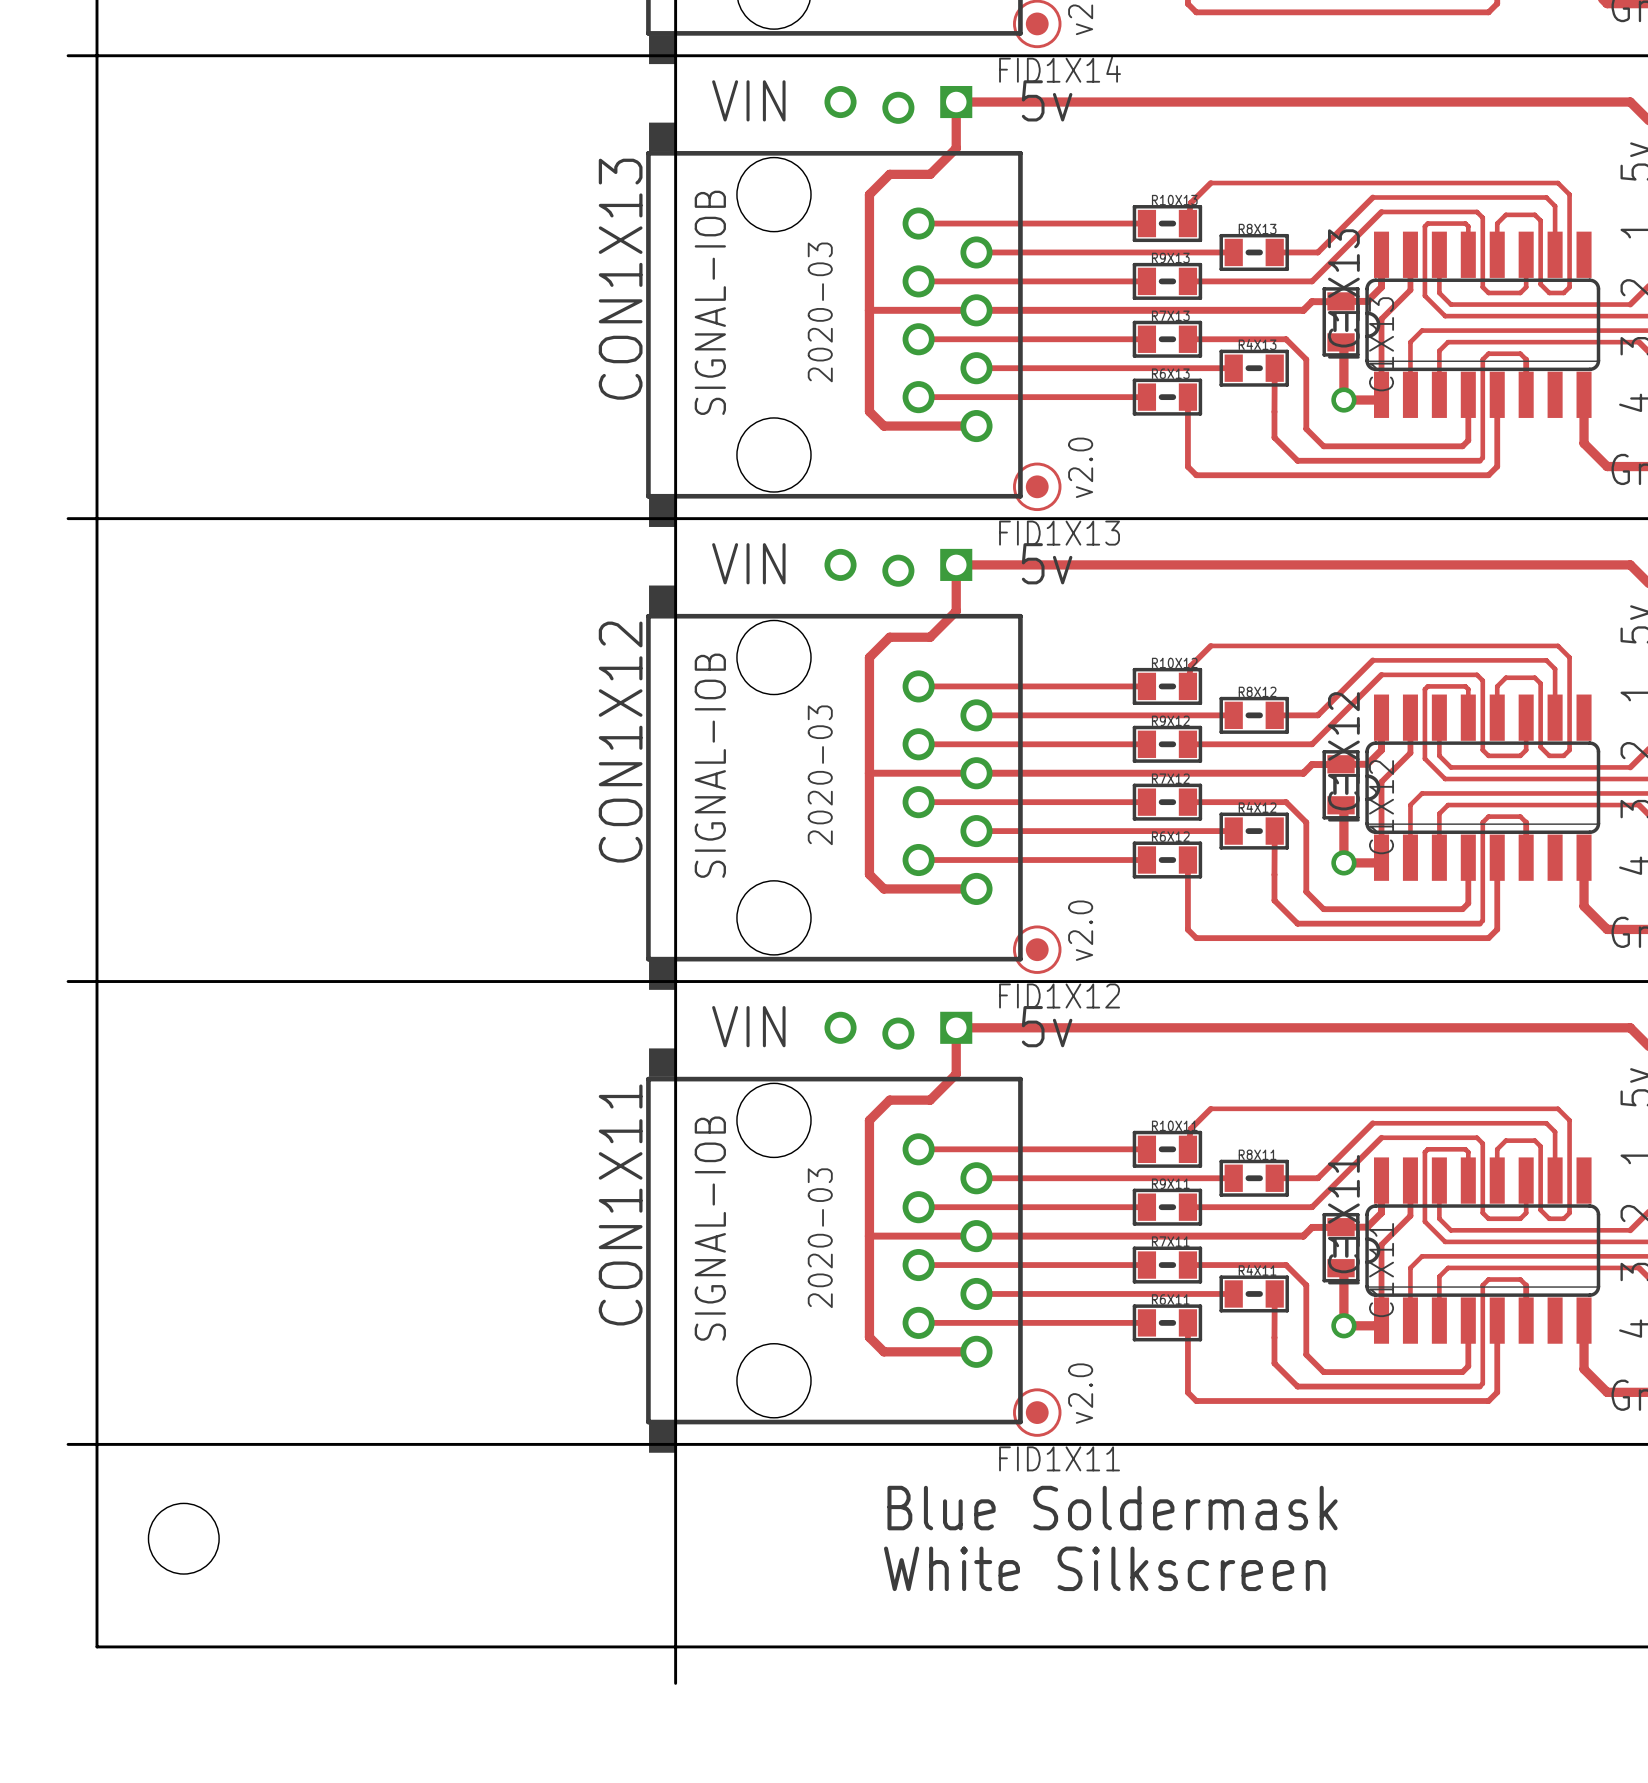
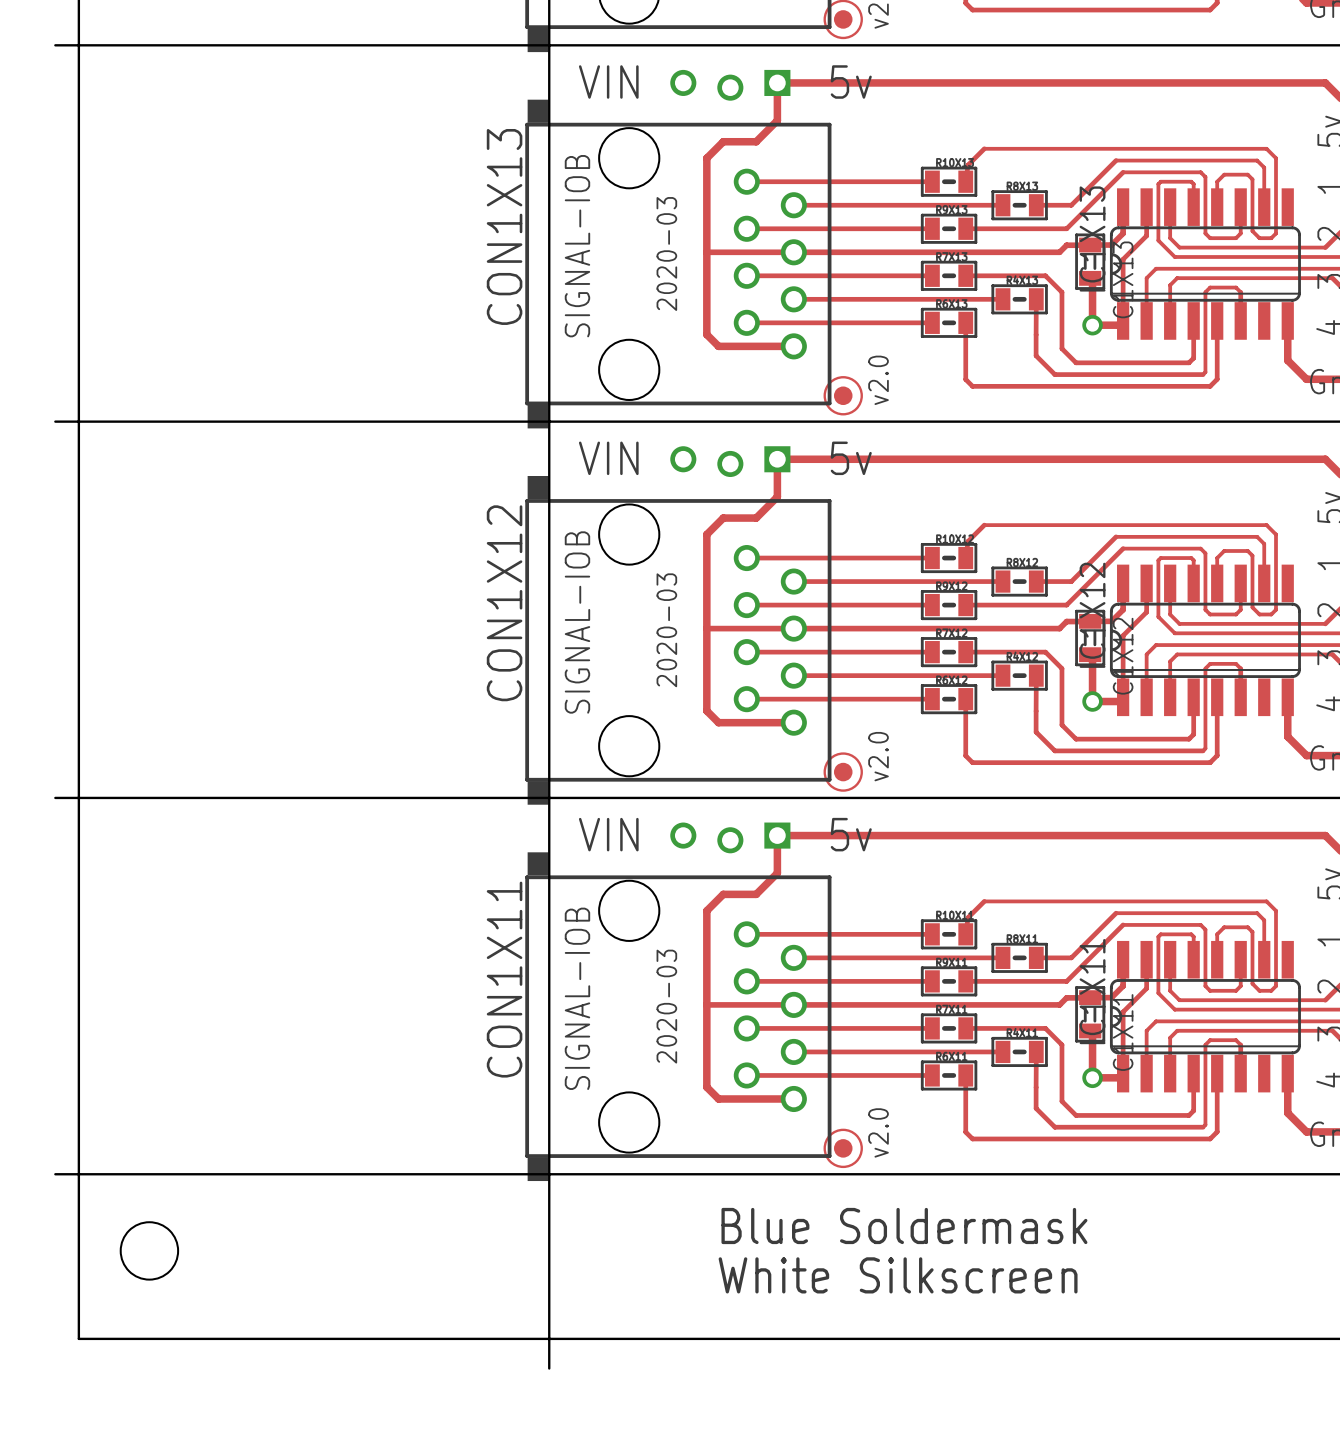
FID1X14 name: FID1X14 (1060, 69) -> none
FID1X13 name: FID1X13 (1059, 533) -> none
FID1X12 name: FID1X12 (1059, 995) -> none
FID1X11 name: FID1X11 (1059, 1458) -> none

